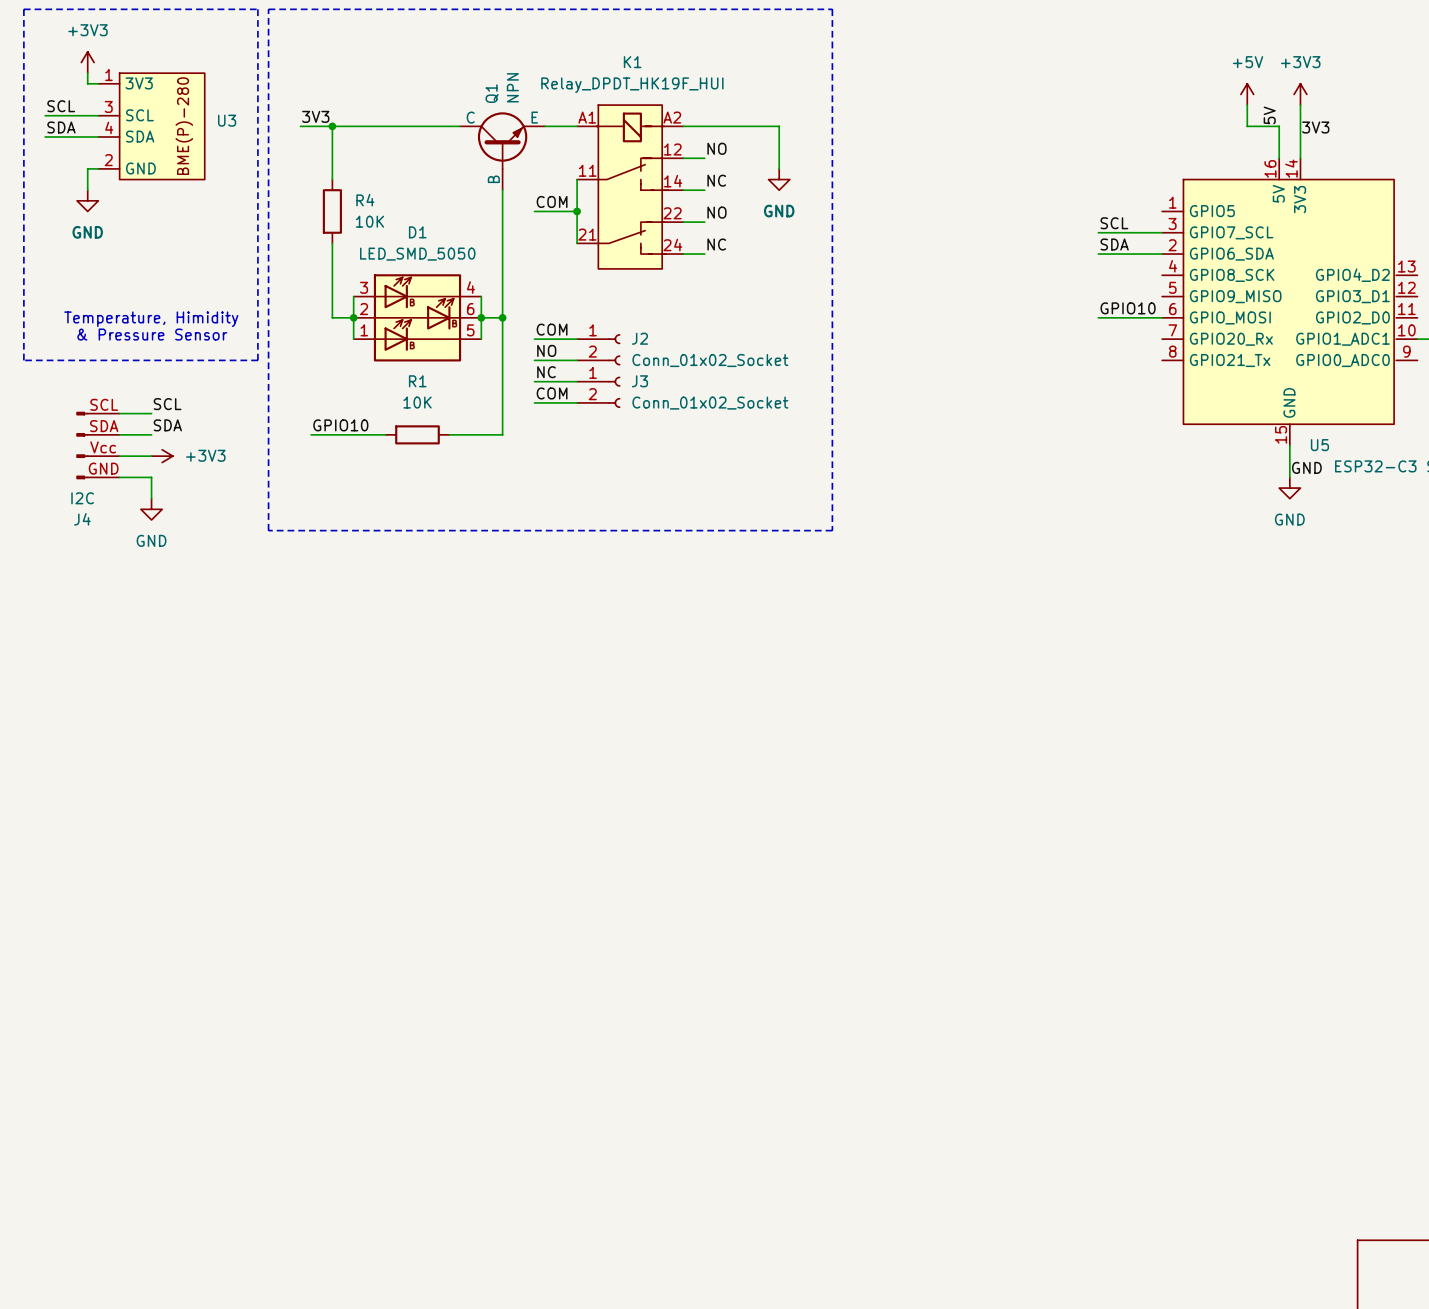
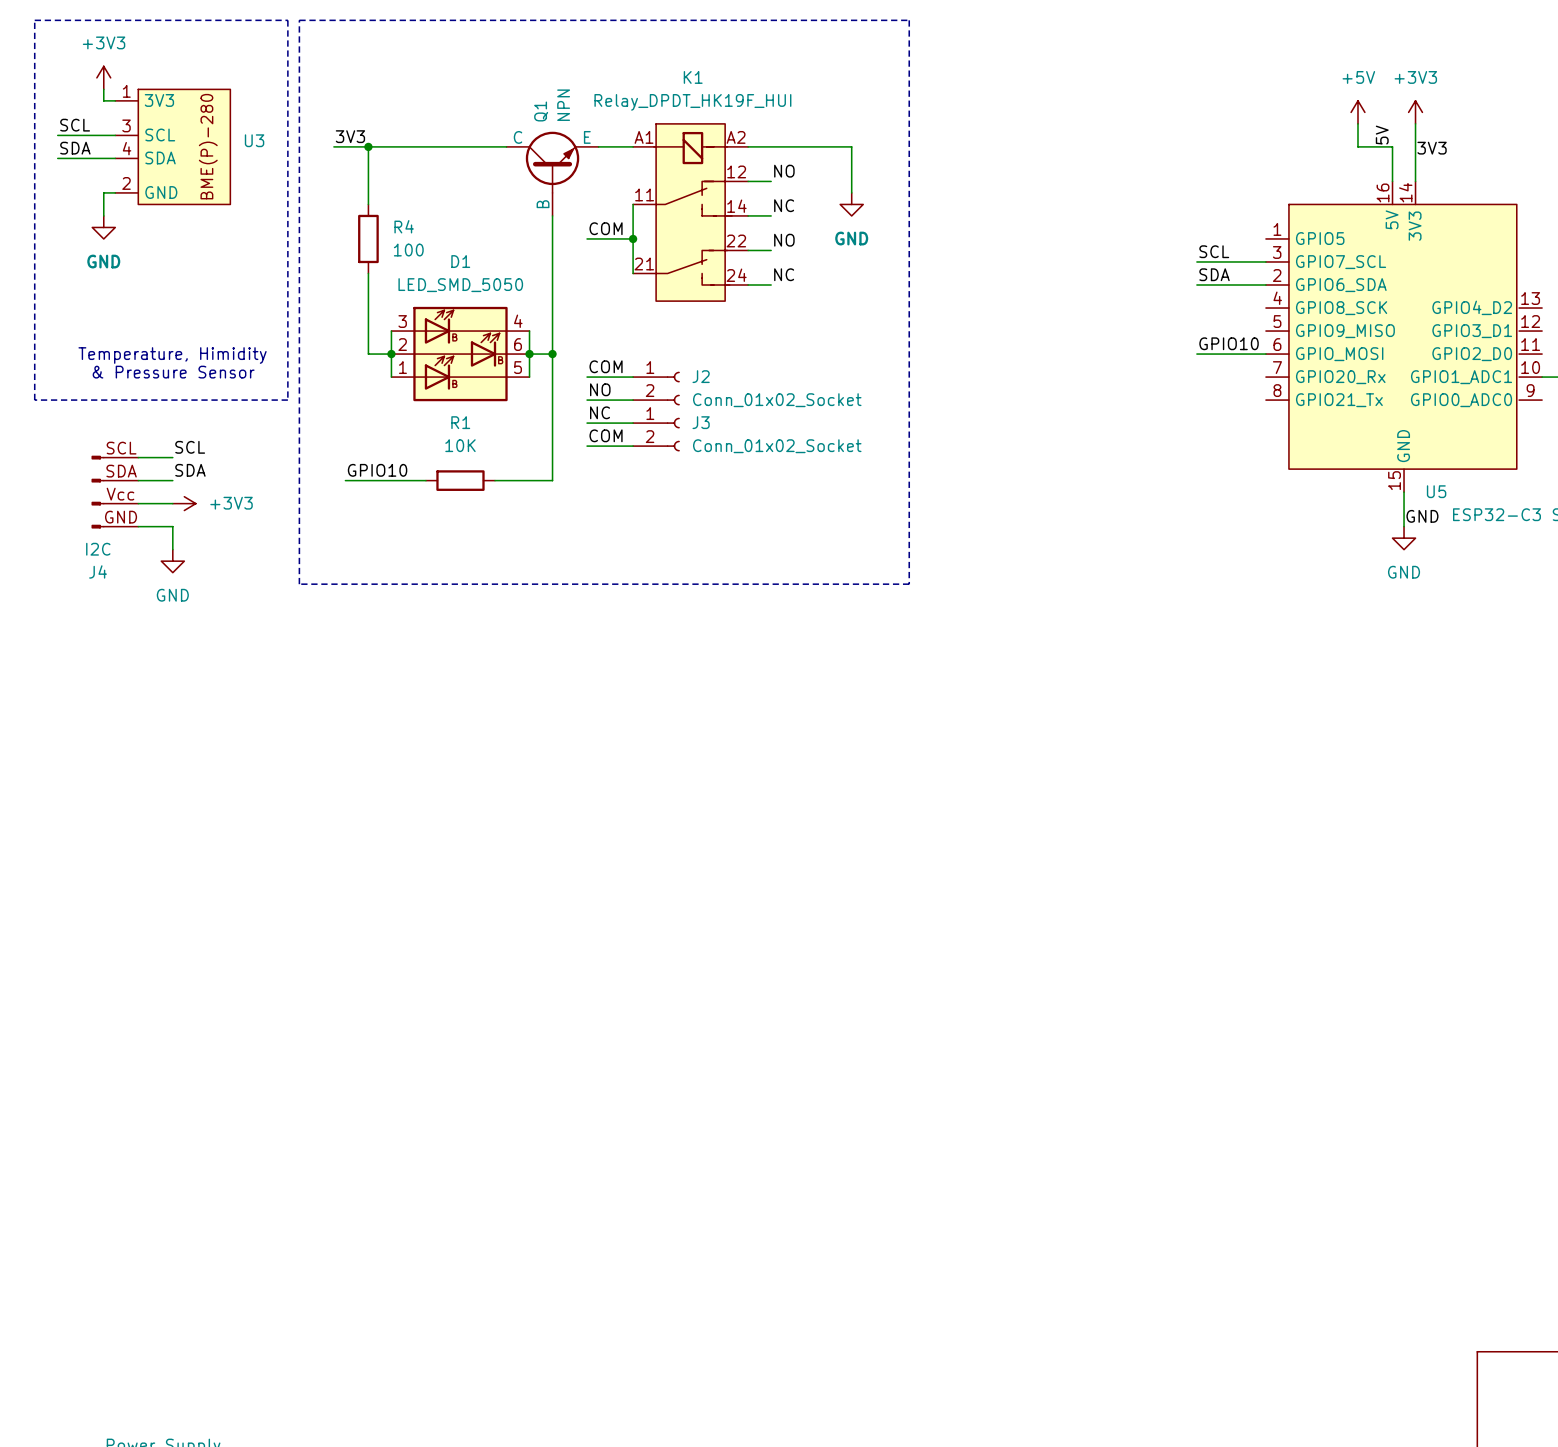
R4 value: 10K (369, 221) -> 100 (408, 250)

